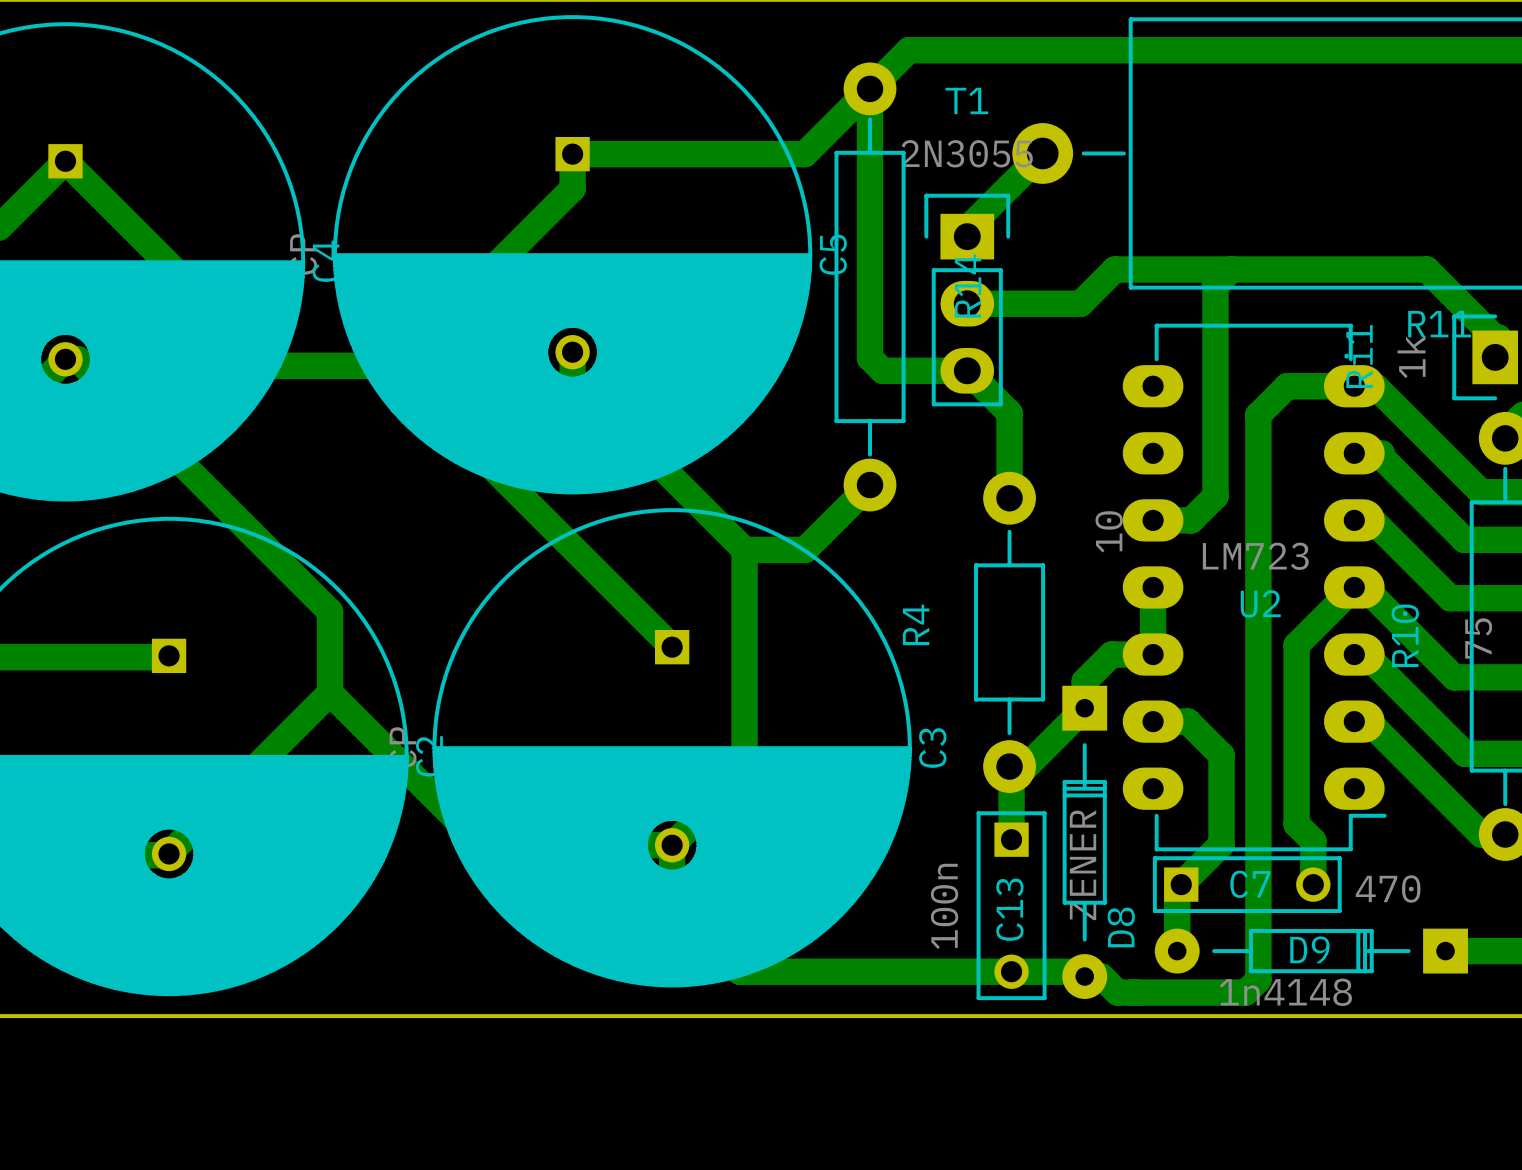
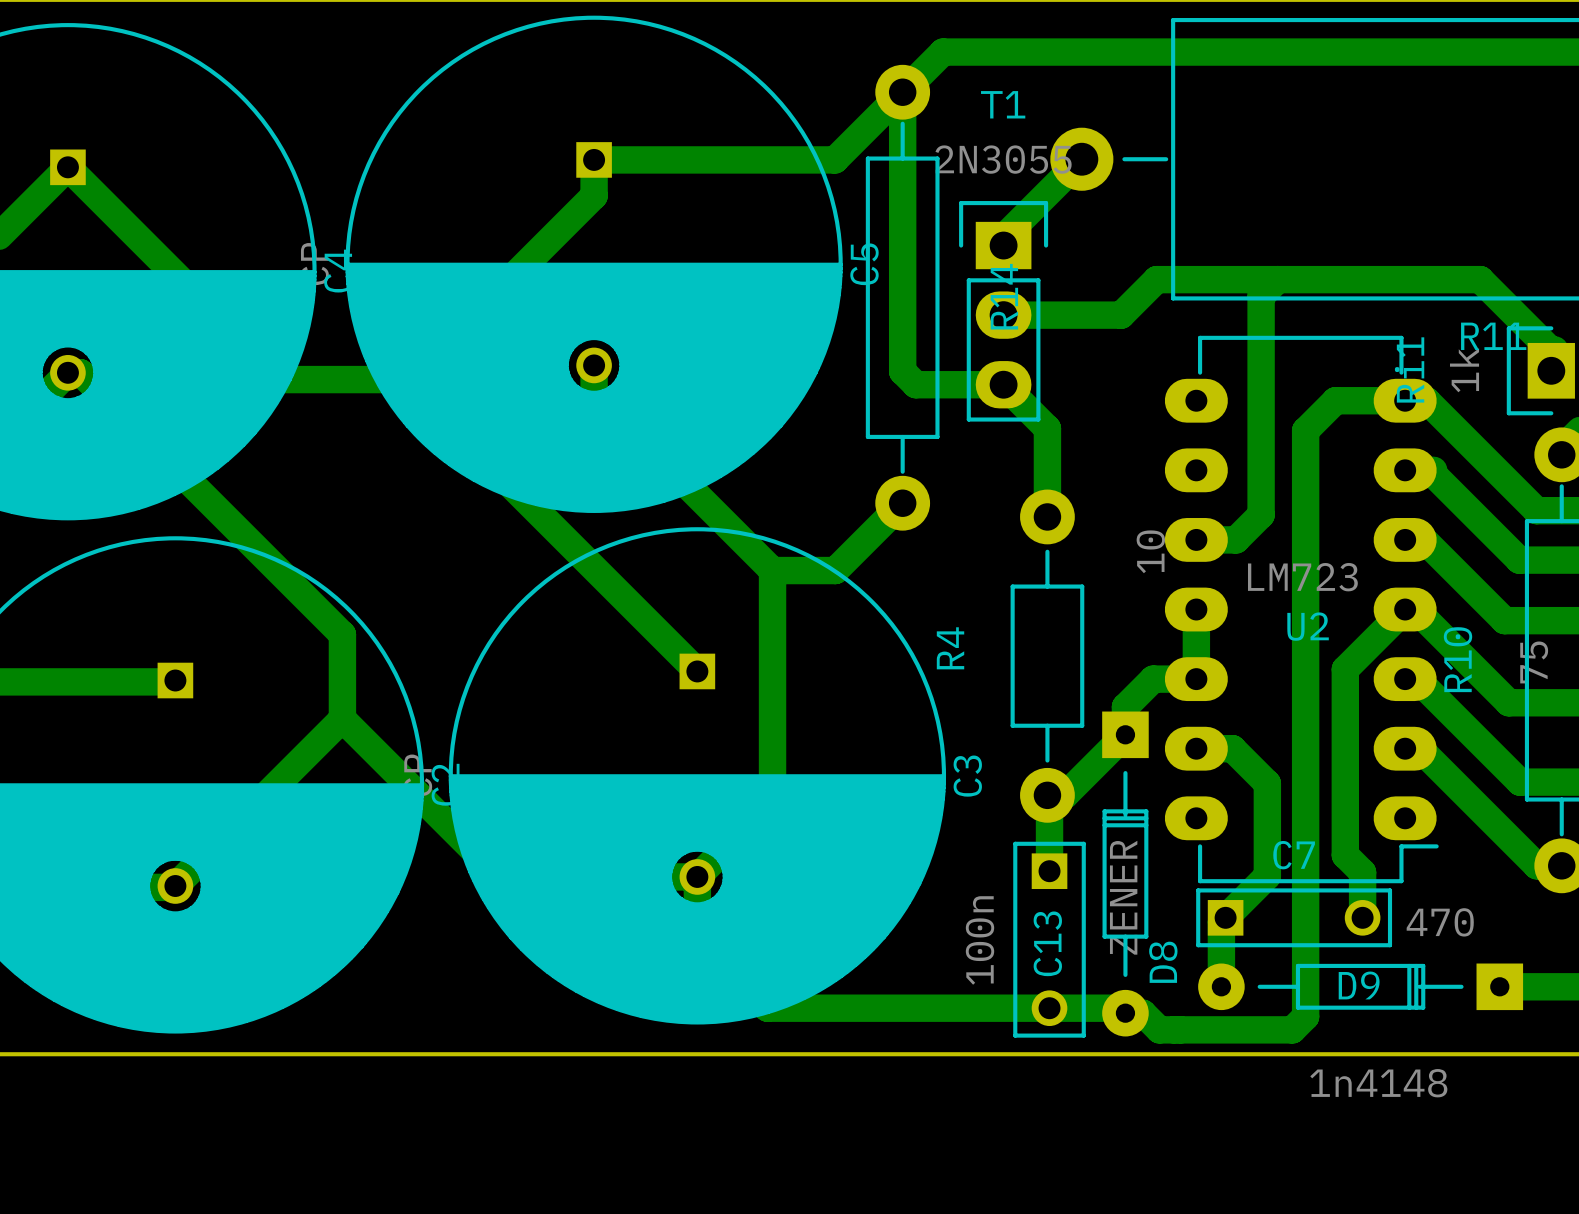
C7 name position: C7 (1250, 884) -> C7 (1294, 855)
D9 value position: 1n4148 (1285, 992) -> 1n4148 (1378, 1083)

